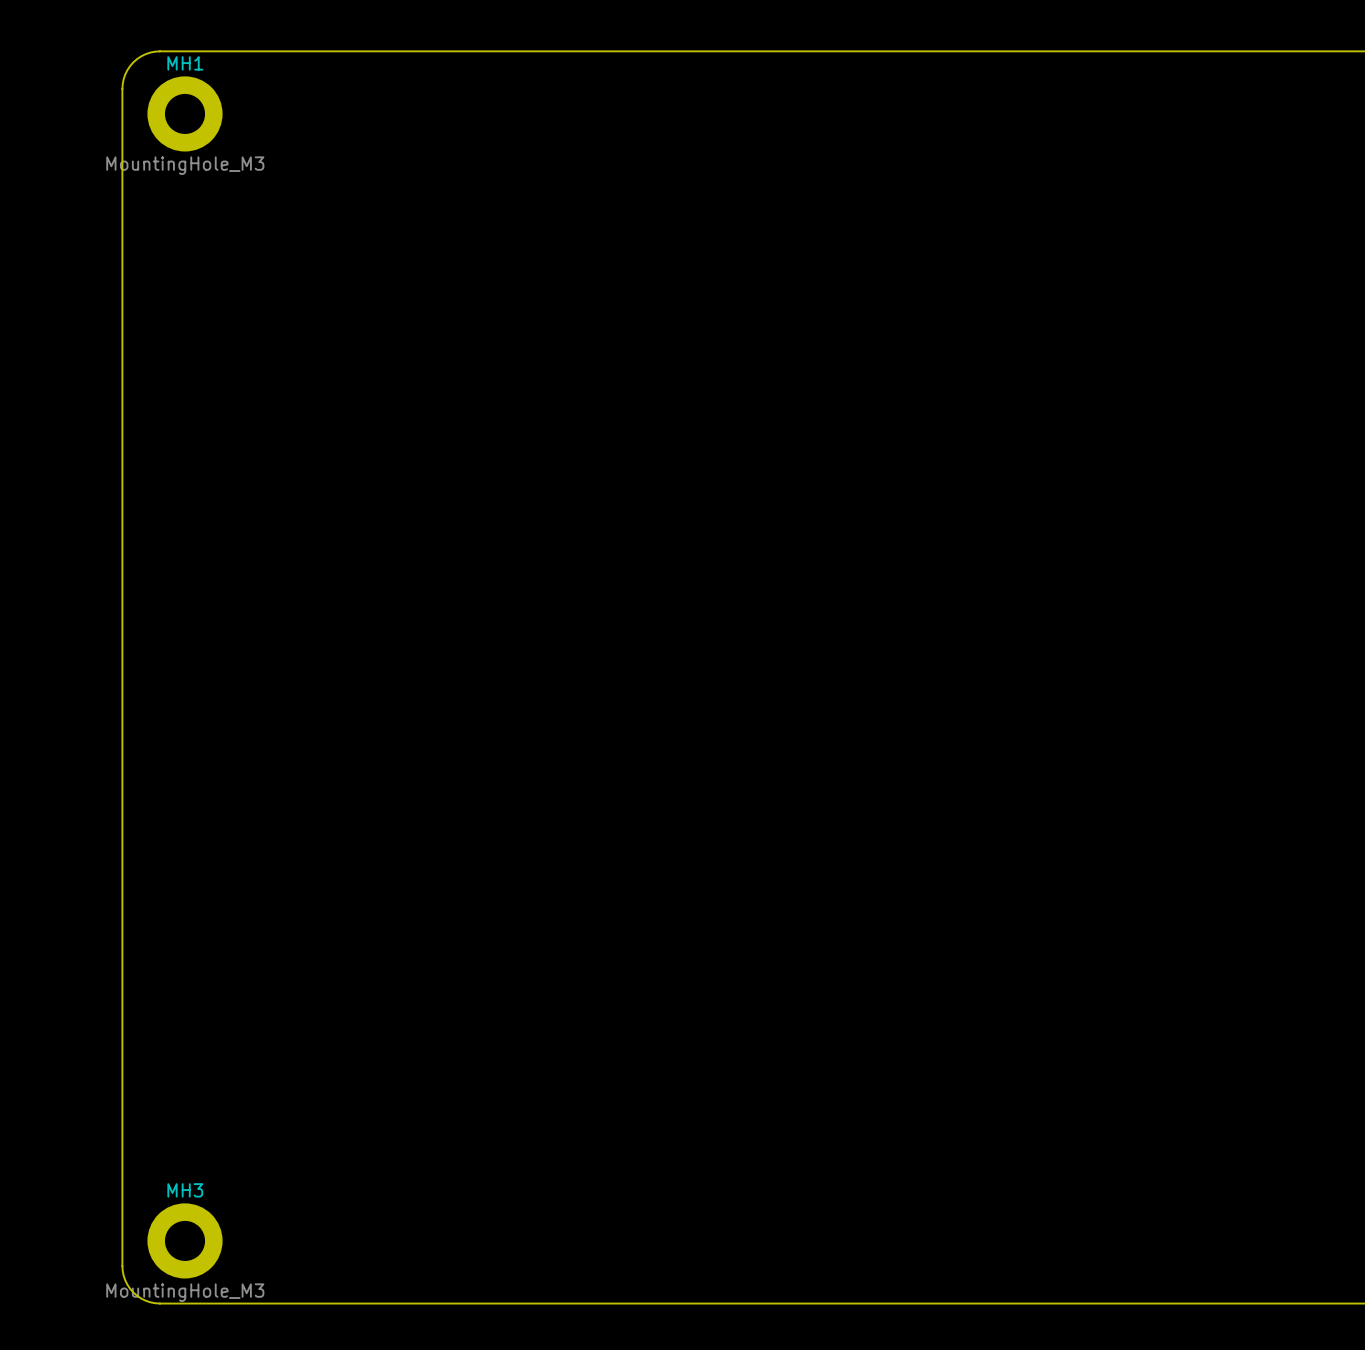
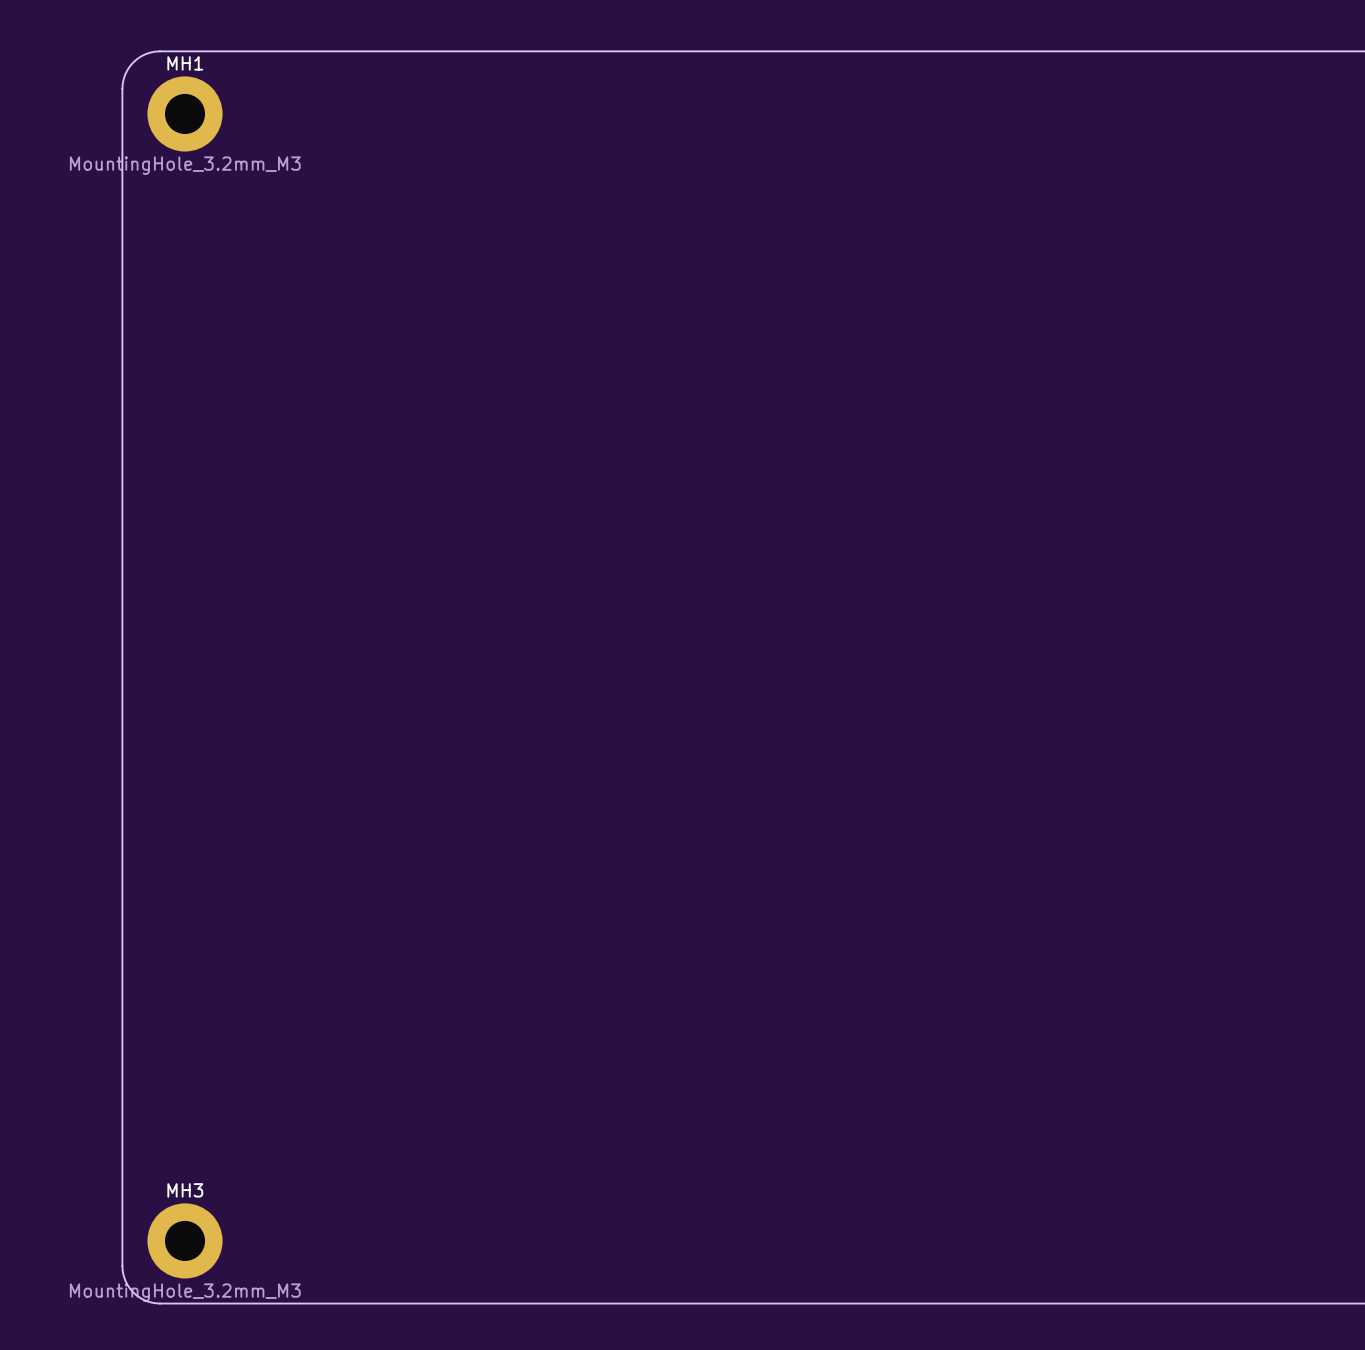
MH1 value: MountingHole_M3 (185, 165) -> MountingHole_3.2mm_M3 (185, 165)
MH3 value: MountingHole_M3 (185, 1292) -> MountingHole_3.2mm_M3 (185, 1292)

